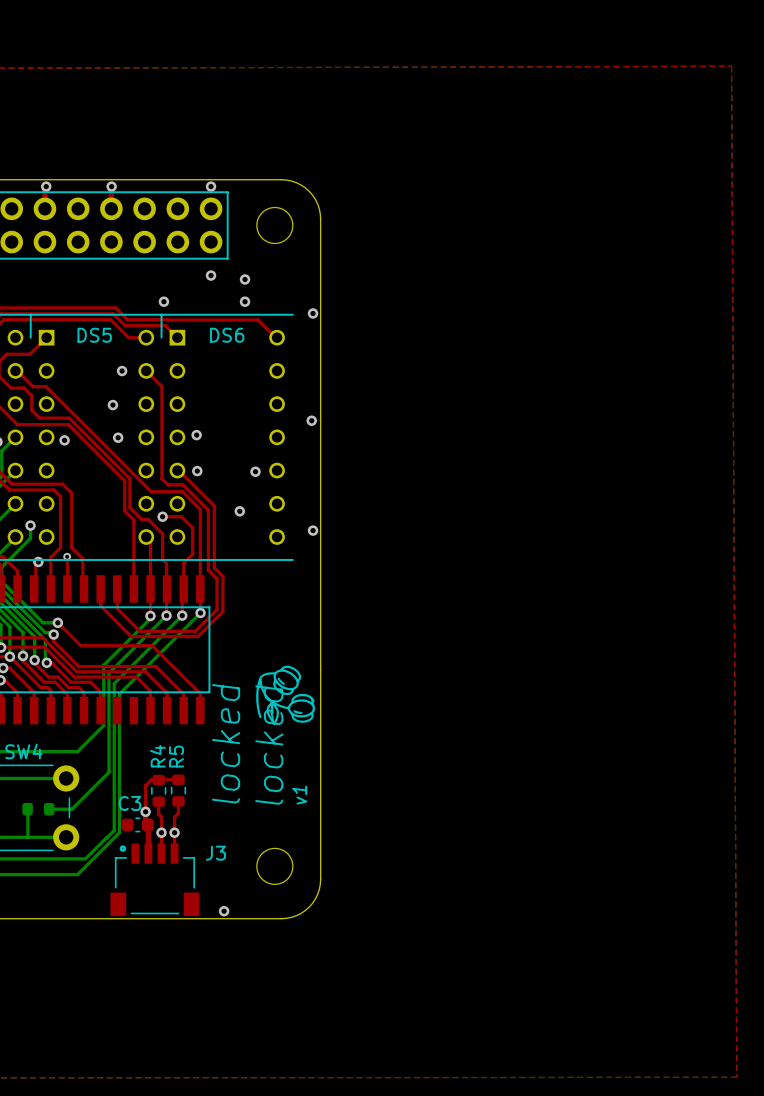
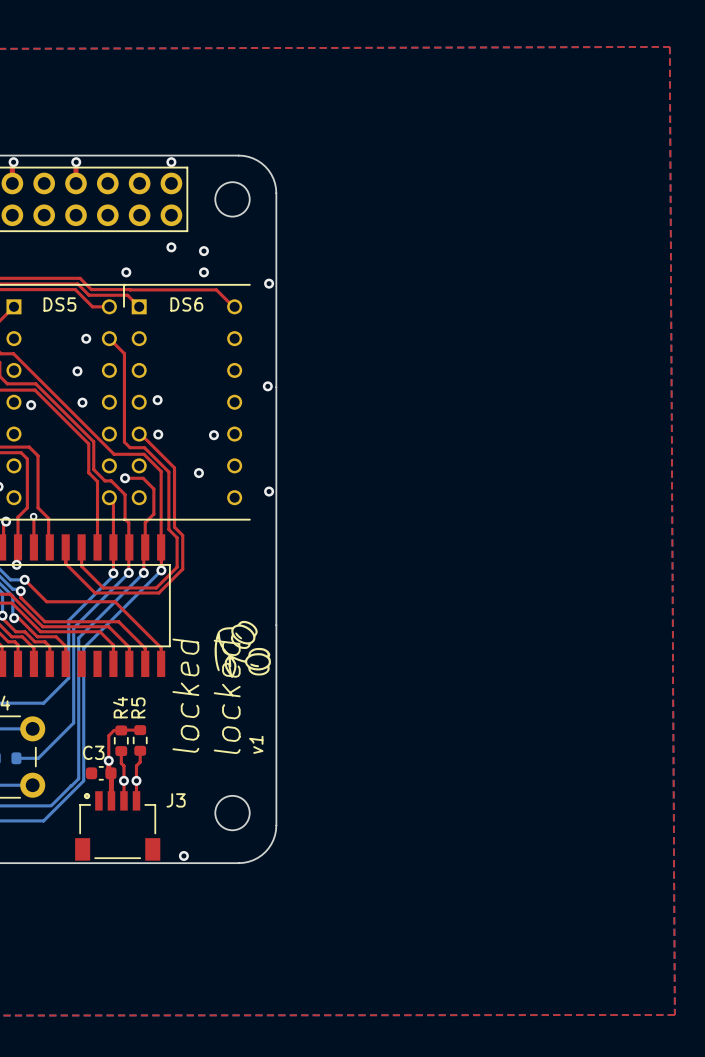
via: none -> (16, 564)

